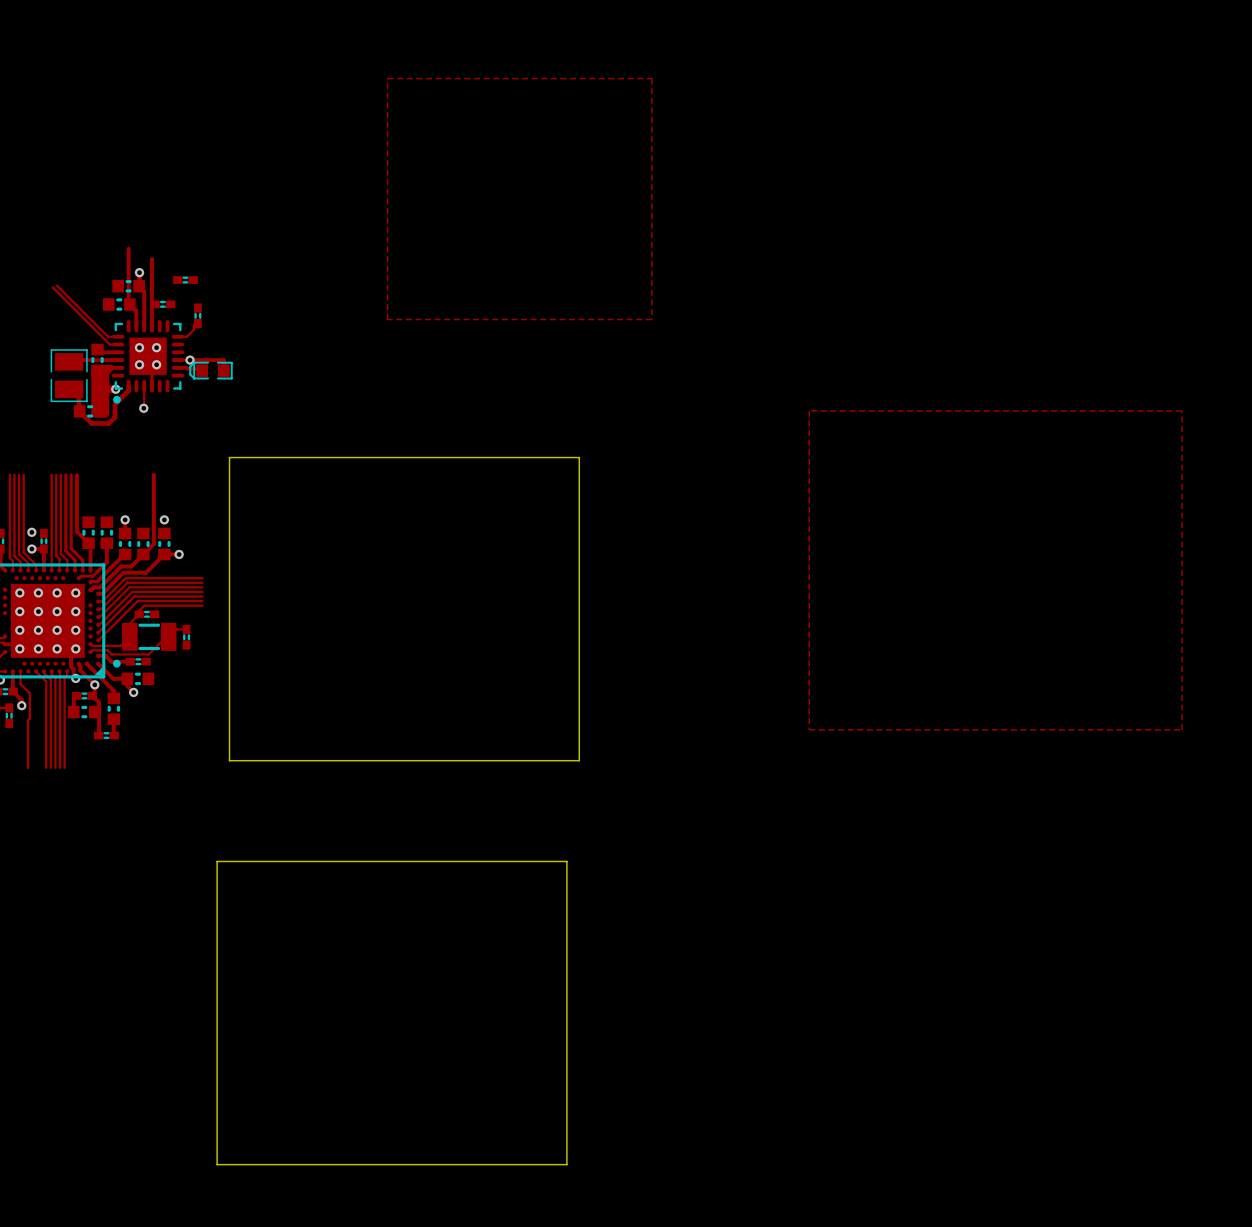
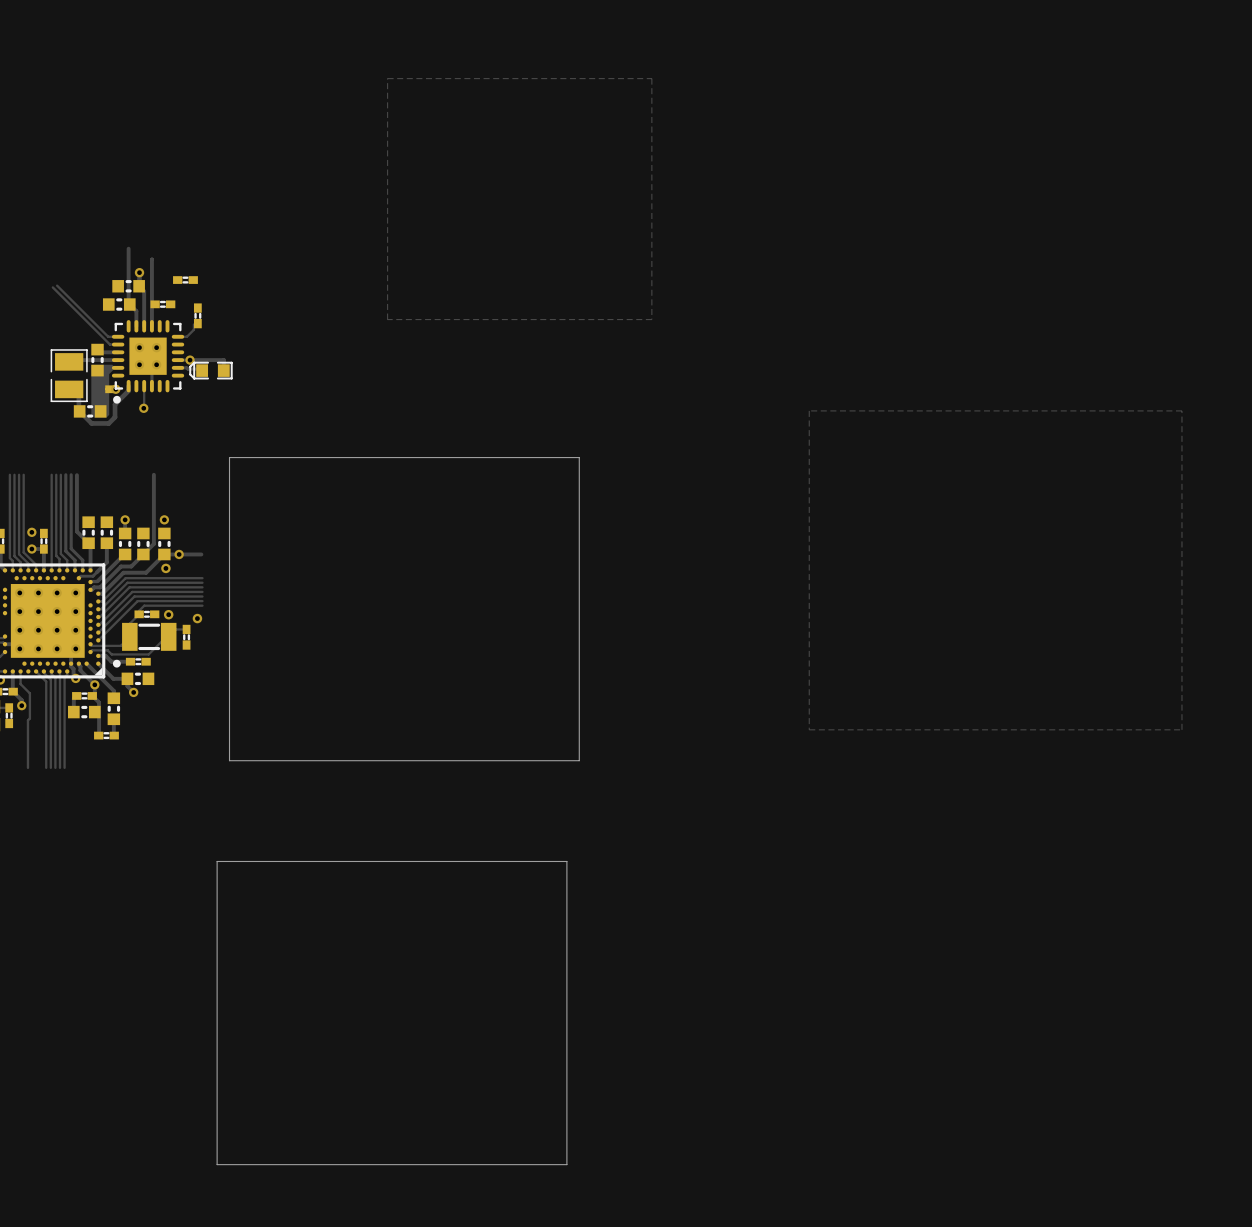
track: none -> (179, 554) (201, 554)
via: none -> (165, 568)
via: none -> (168, 614)
via: none -> (197, 618)

